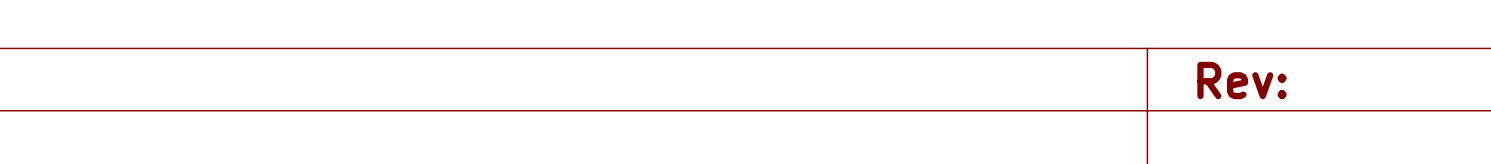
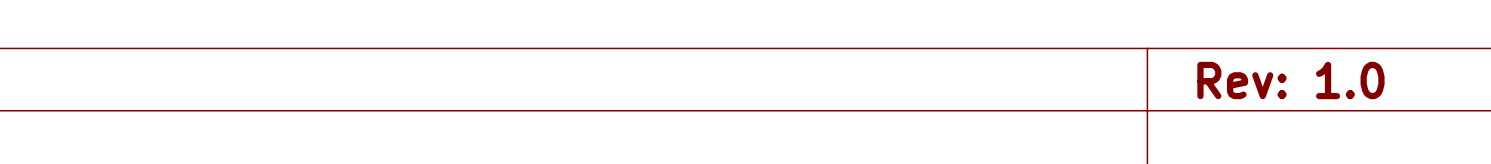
title block: Rev: (1242, 80) -> Rev: 1.0 (1290, 80)

